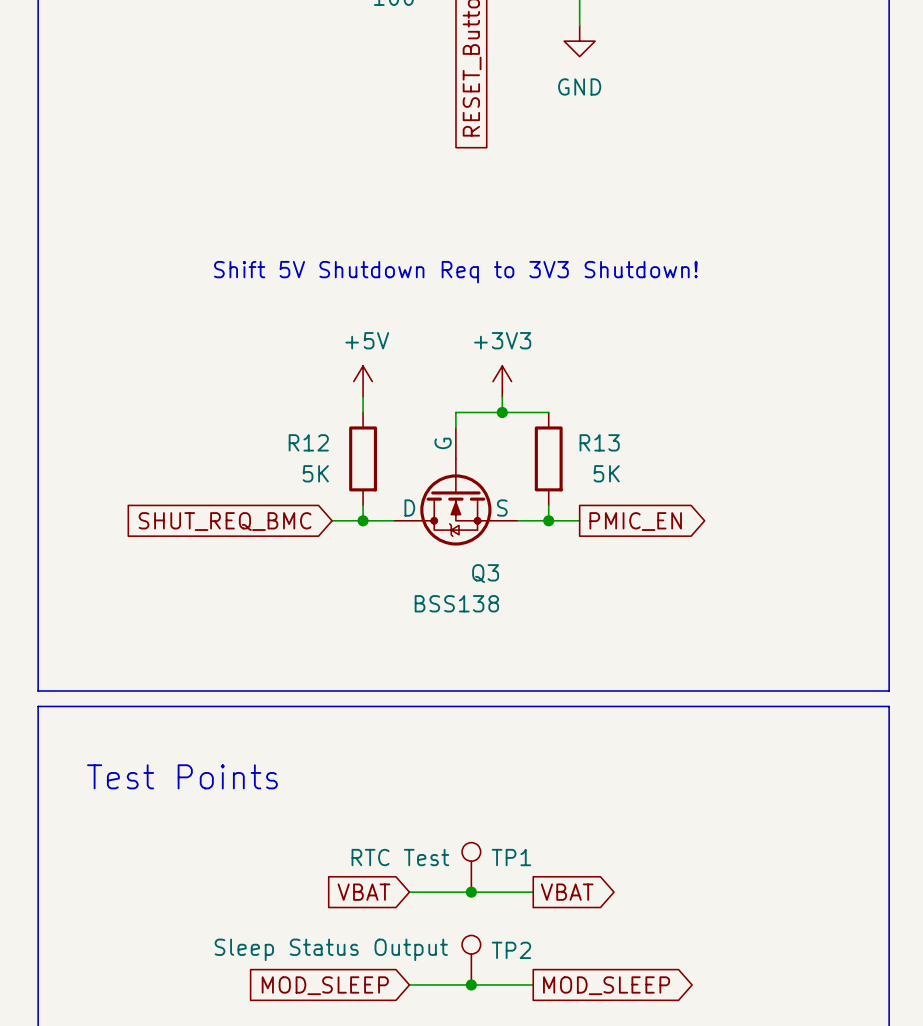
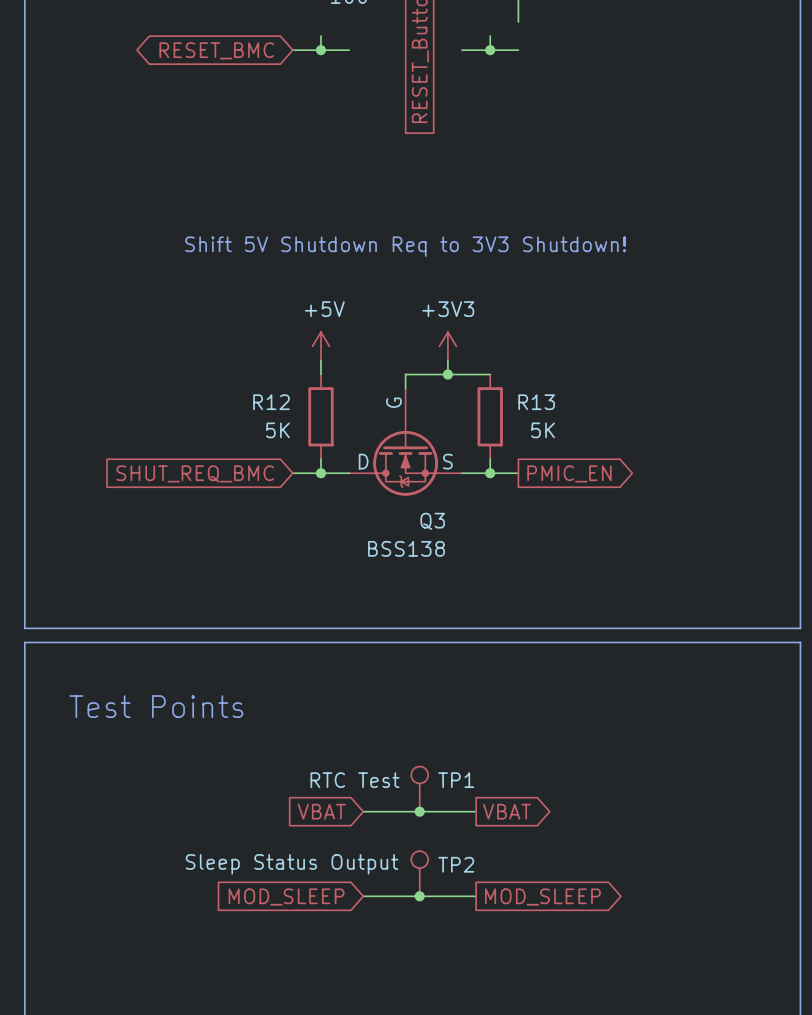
wire: none -> (320, 36) (320, 50)
wire: none -> (490, 36) (490, 50)
power symbol: GND (579, 41) -> none
wire: none -> (292, 50) (349, 50)
junction: none -> (320, 50)
wire: none -> (462, 50) (518, 50)
junction: none -> (490, 50)
global label: none -> RESET_BMC (216, 50)

